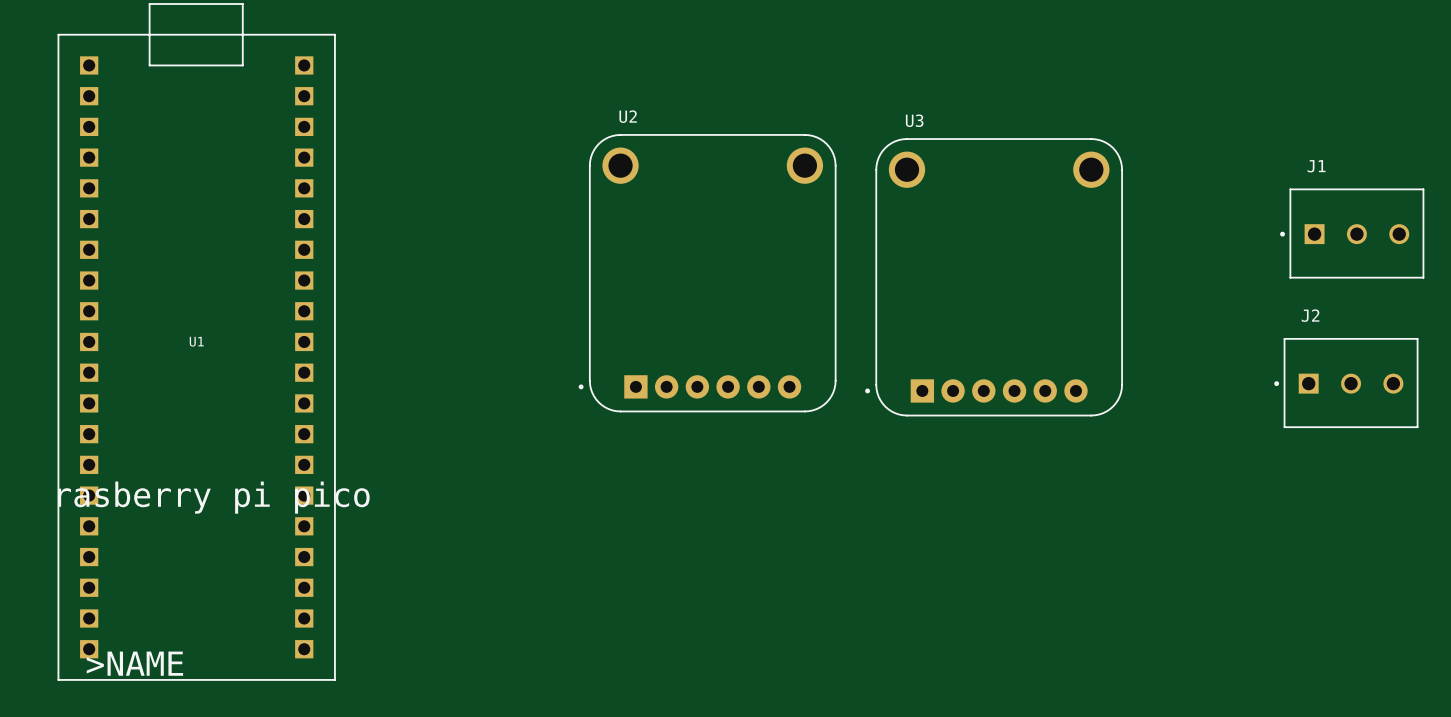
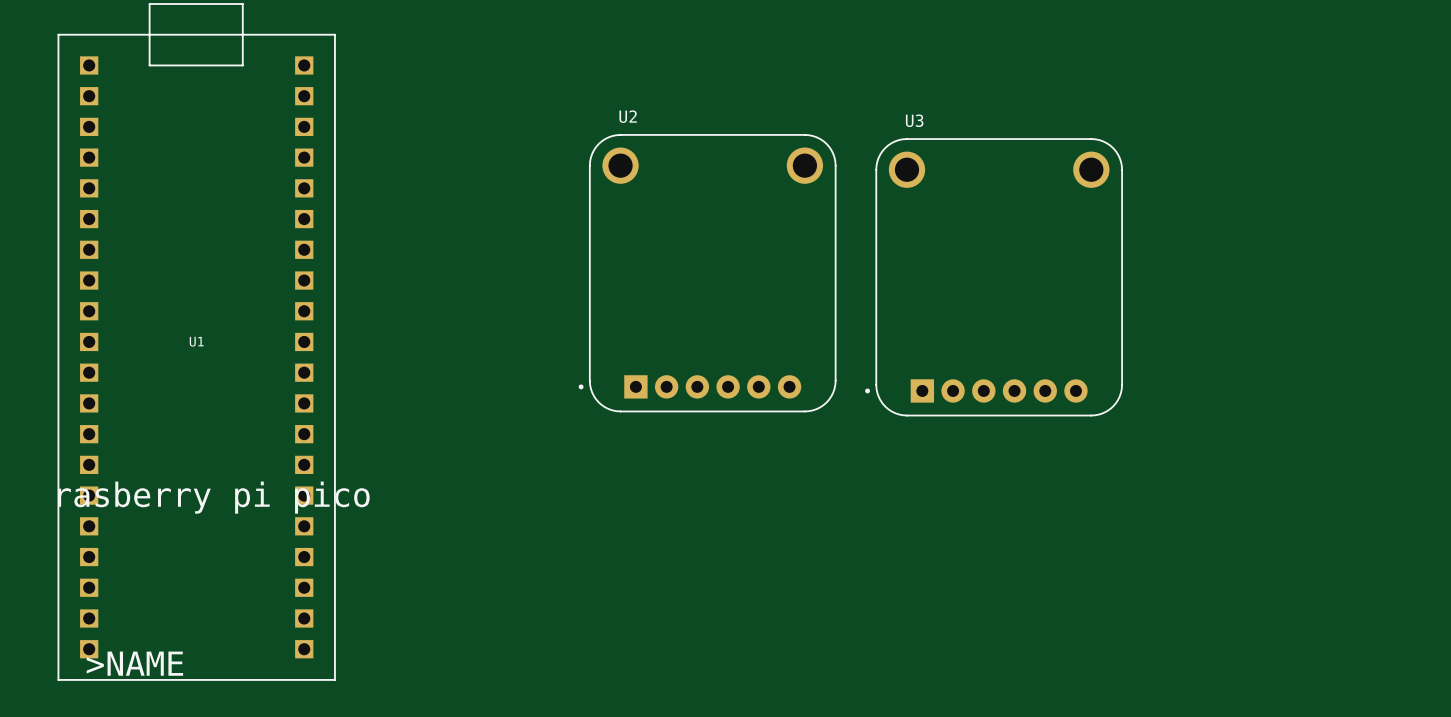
J1: (1352, 233) -> none
J2: (1346, 383) -> none

